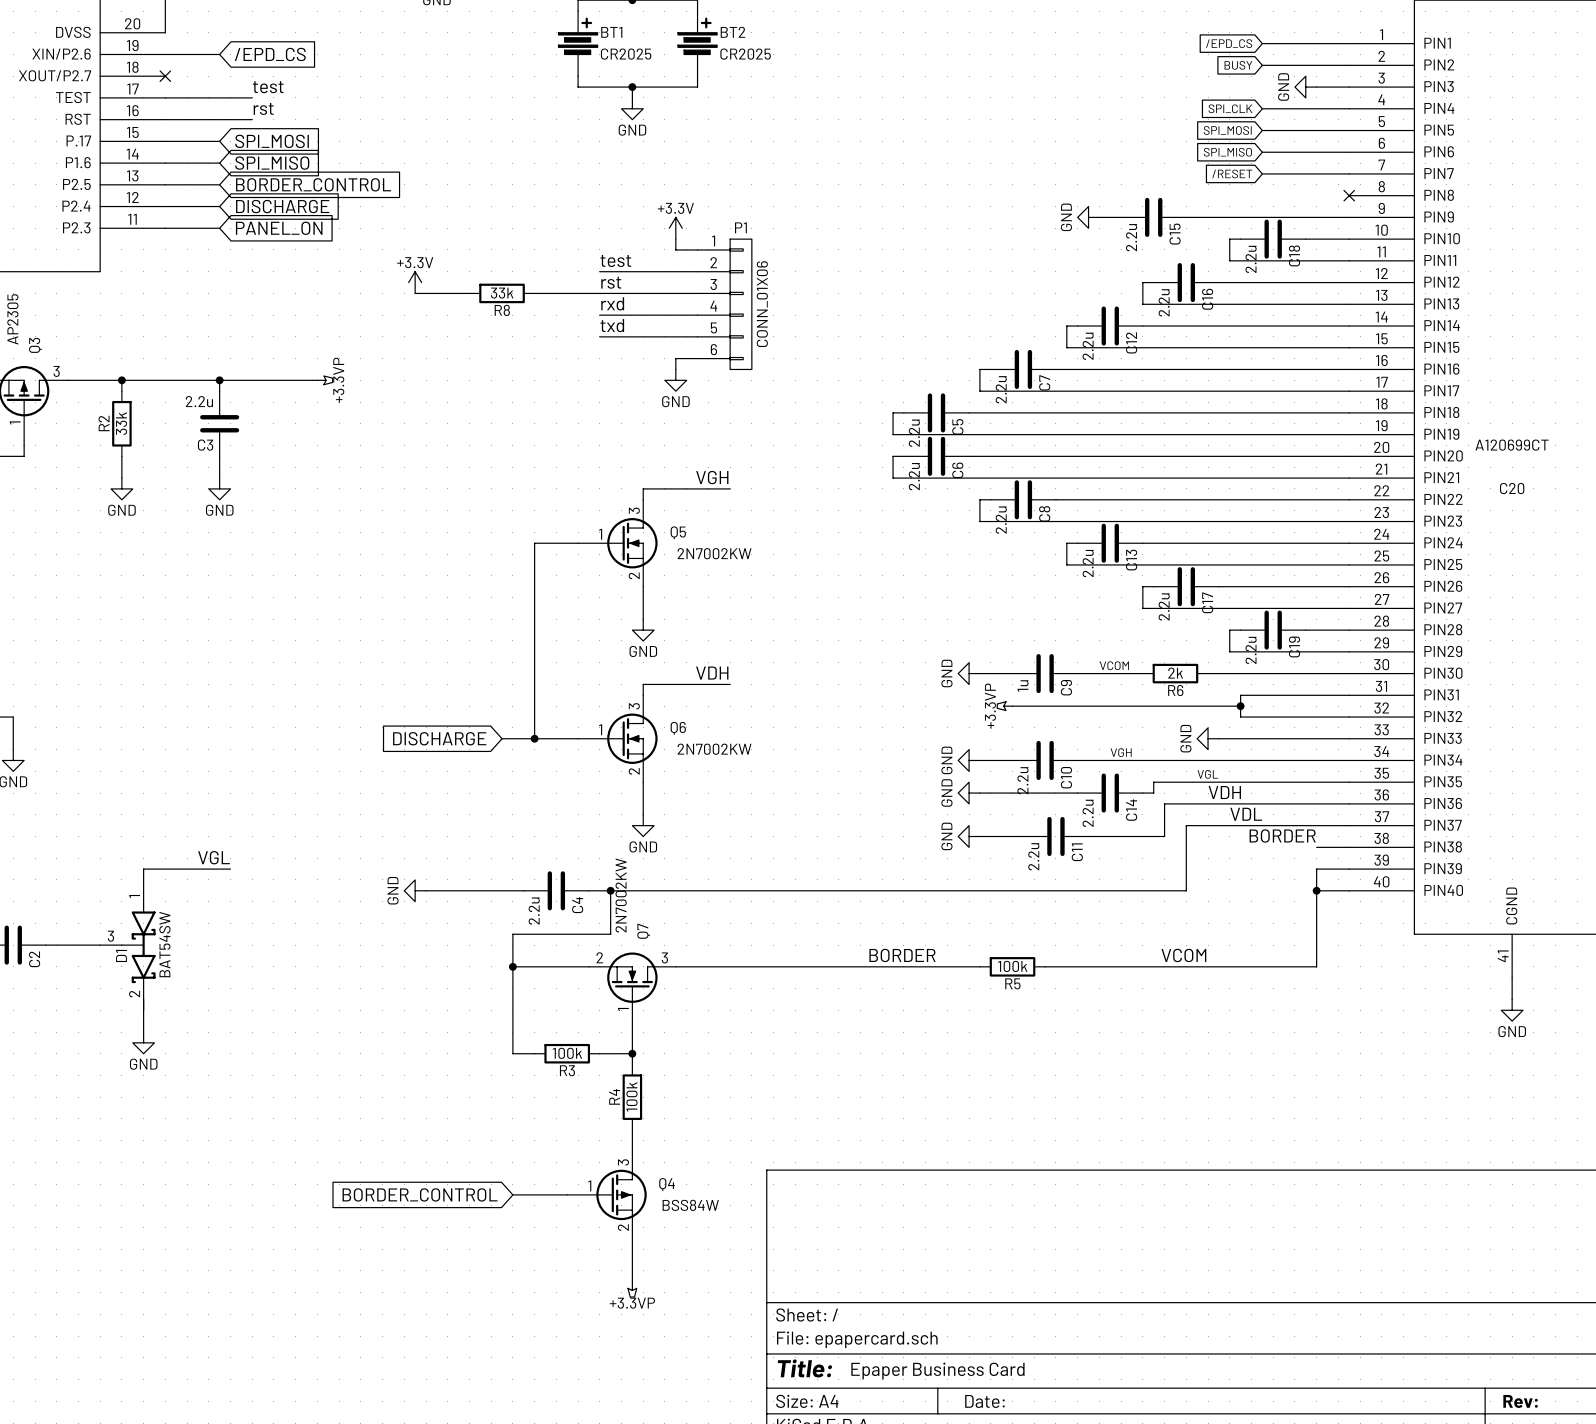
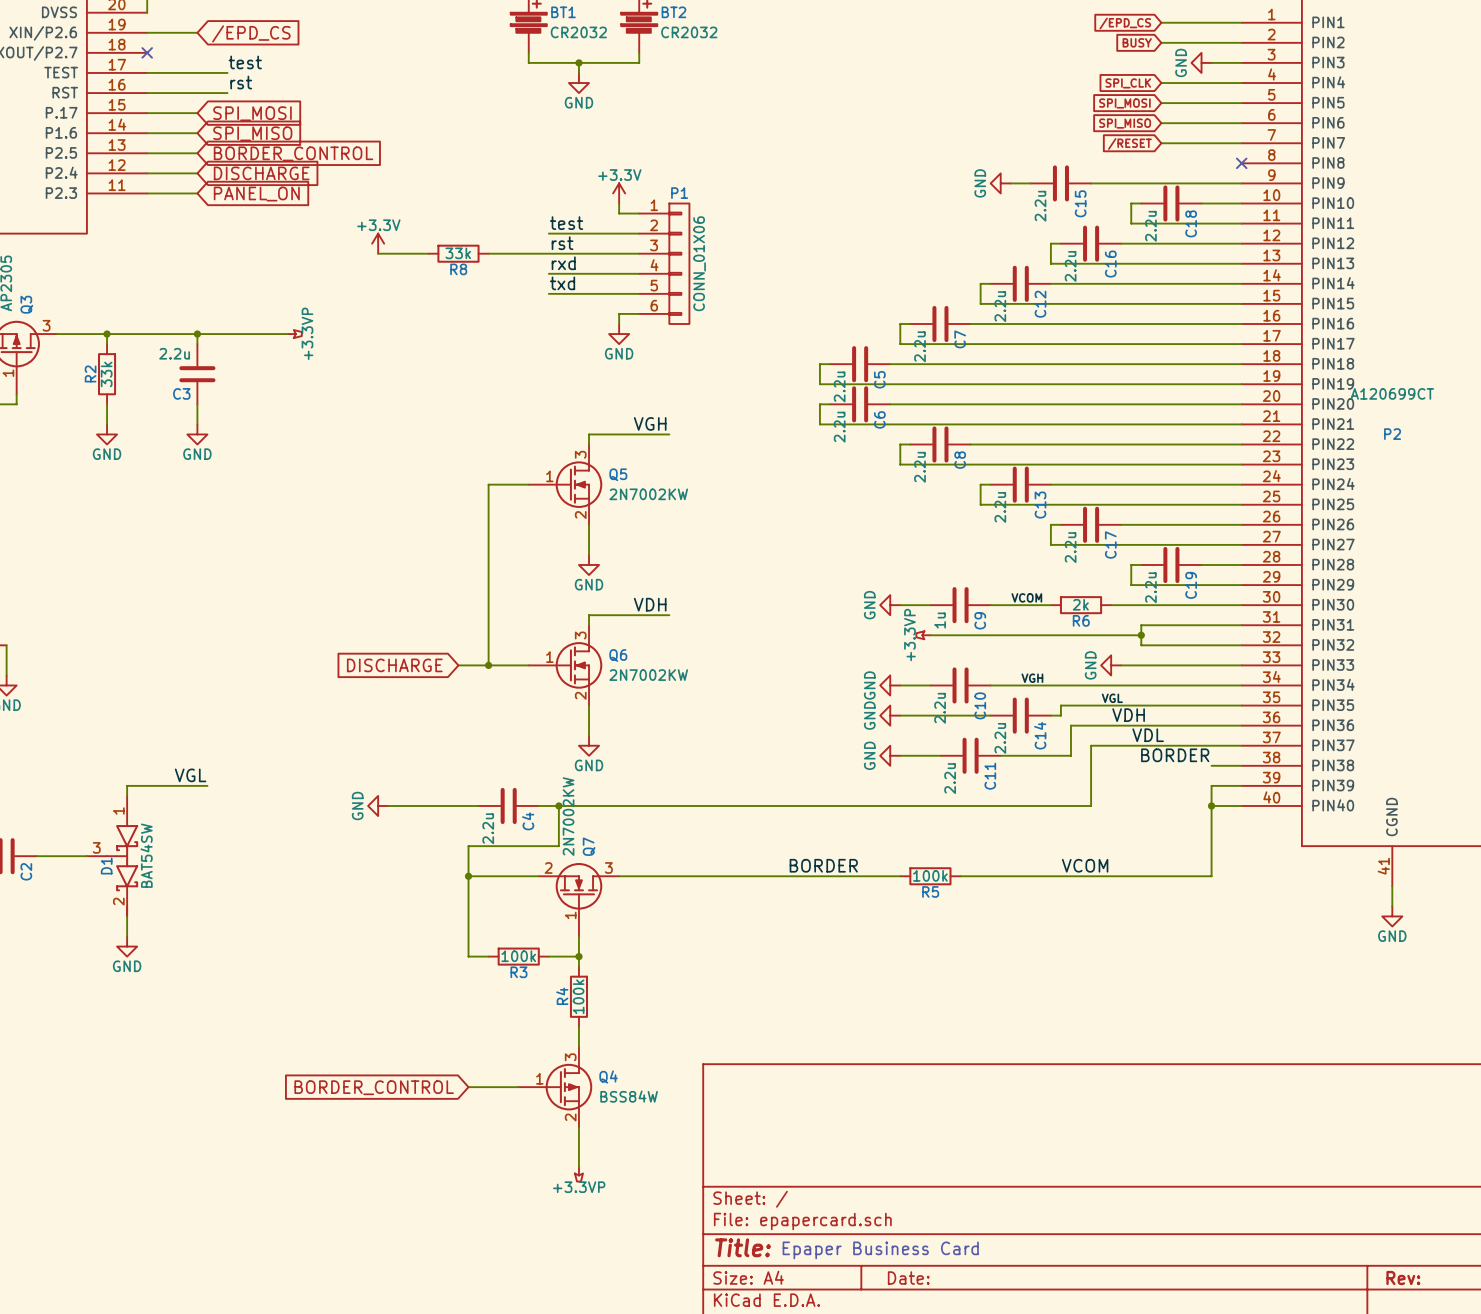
BT1 value: CR2025 (626, 54) -> CR2032 (578, 32)
BT2 value: CR2025 (745, 54) -> CR2032 (689, 32)
C20 name: C20 (1512, 488) -> P2 (1392, 434)

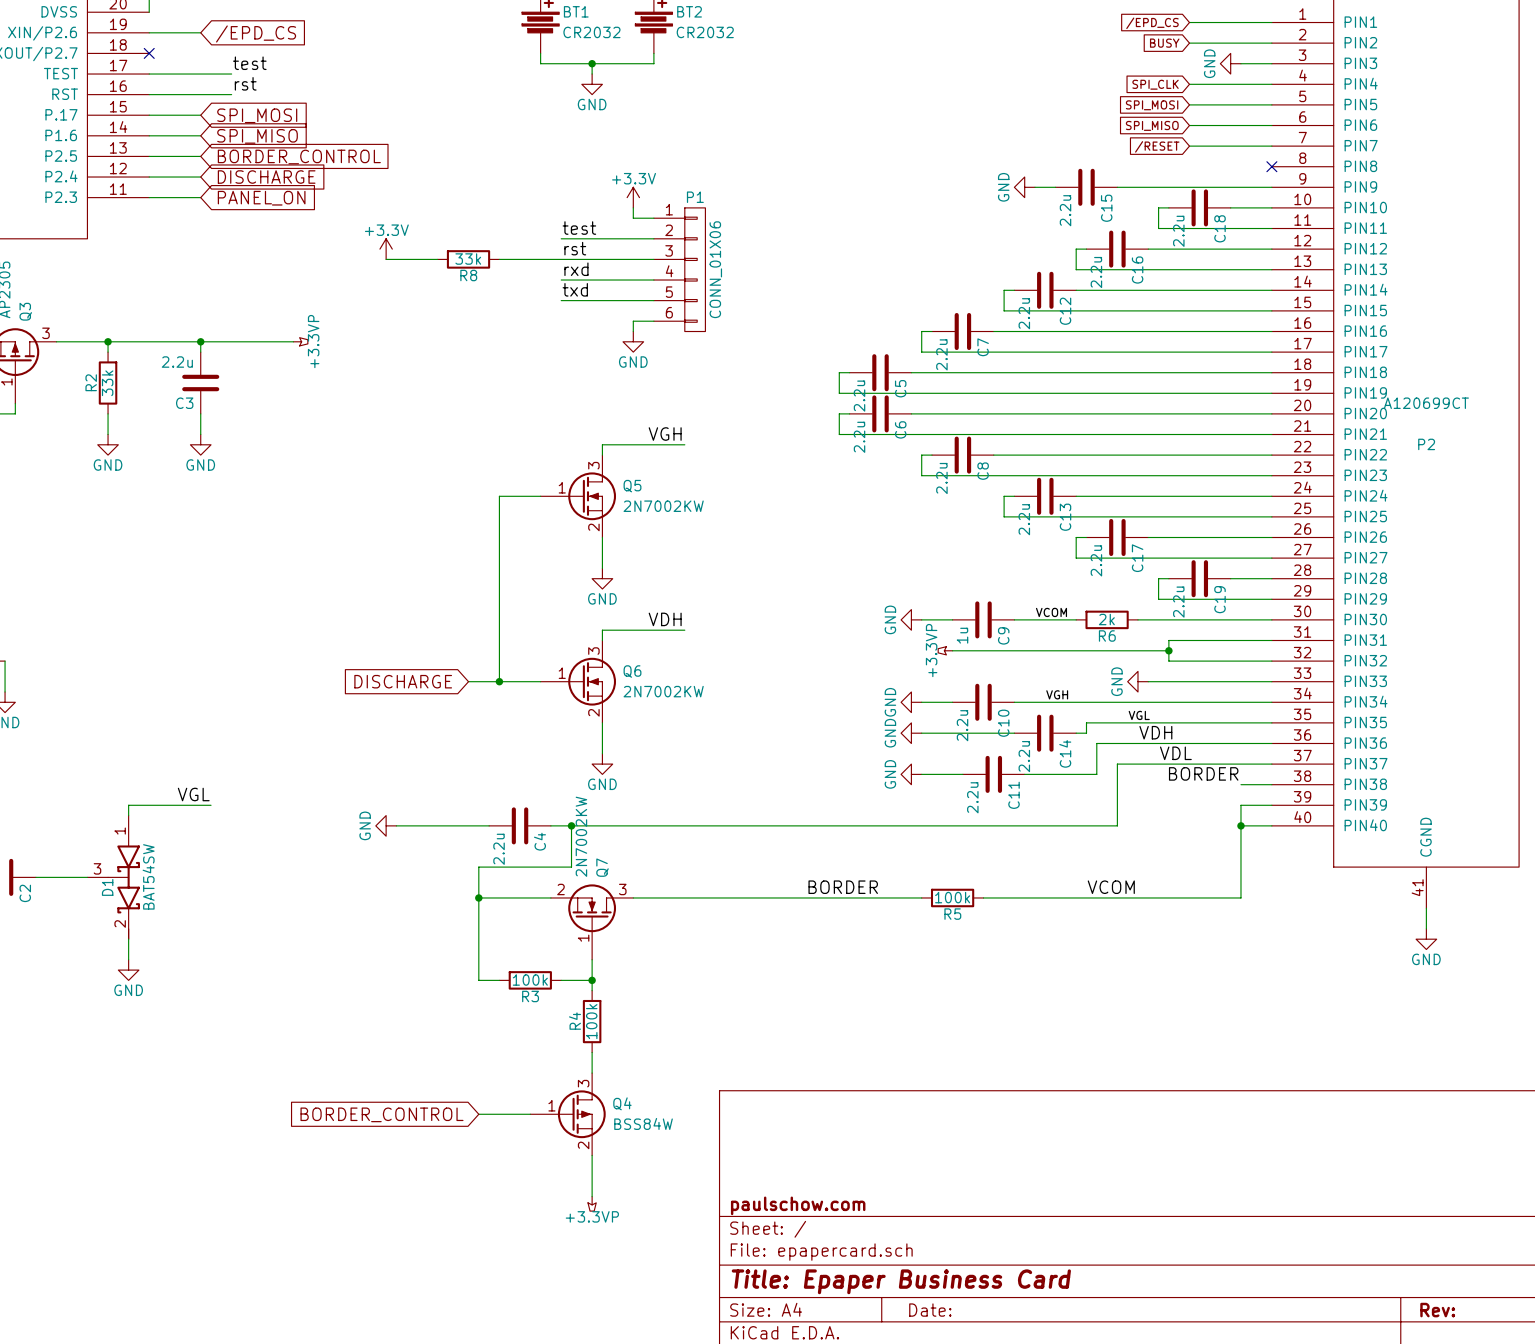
title block: none -> paulschow.com (798, 1205)
title block: Title: (742, 1247) -> Title: Epaper Business Card (901, 1281)
text: Epaper Business Card (880, 1250) -> none

